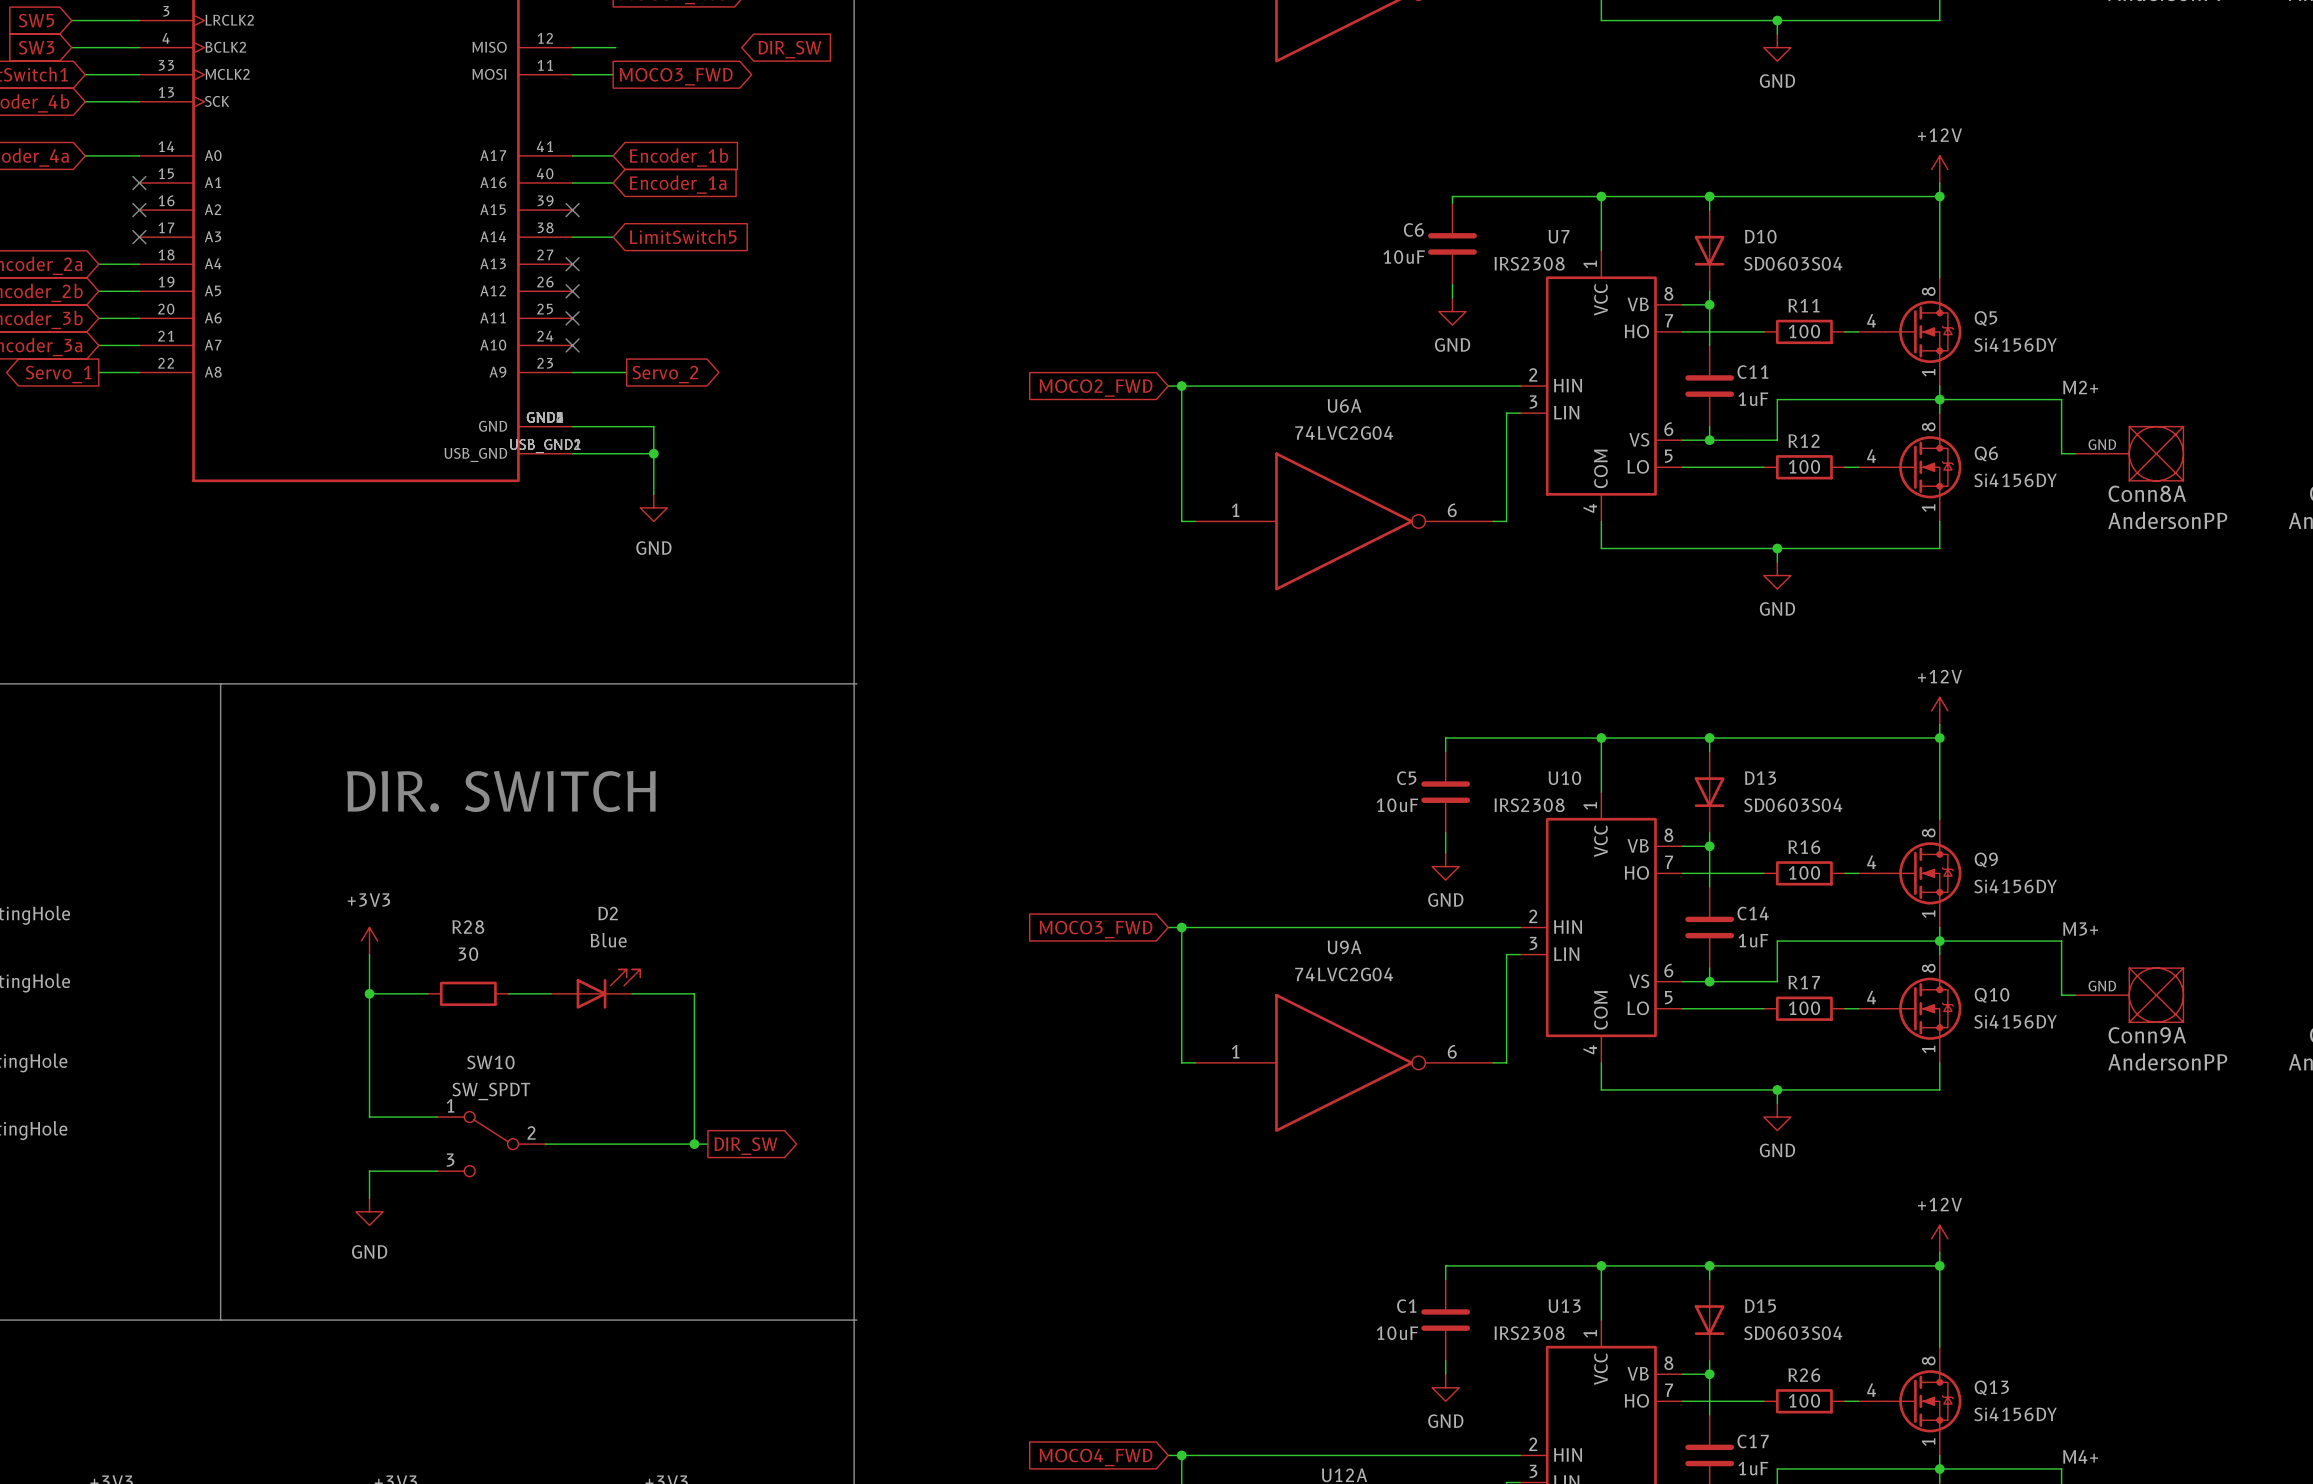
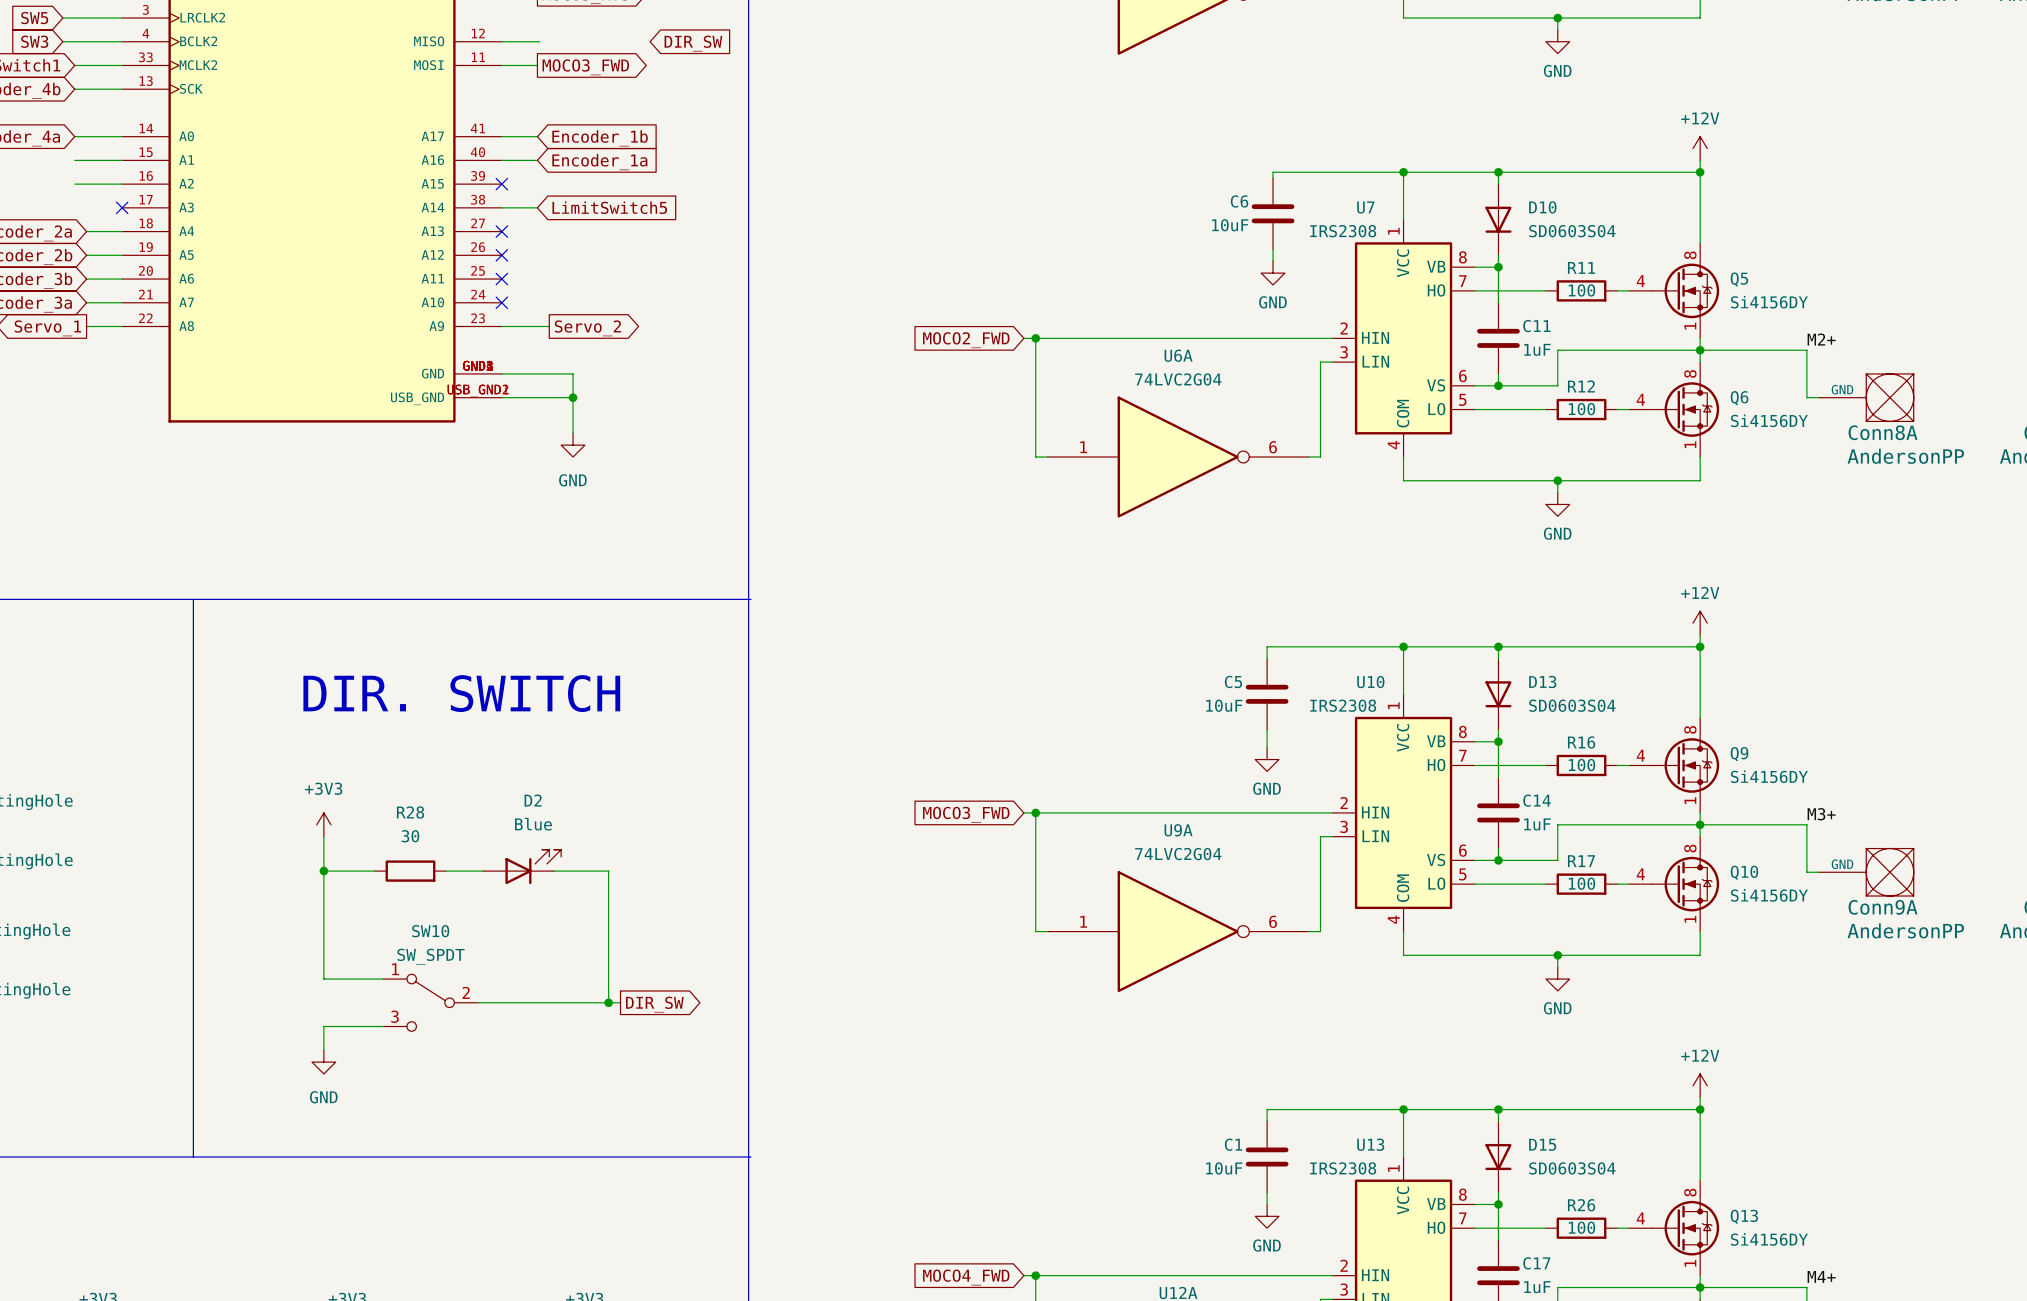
wire: none -> (74, 160) (122, 160)
no-connect mark: (139, 183) -> none
wire: none -> (74, 184) (122, 184)
no-connect mark: (139, 210) -> none

